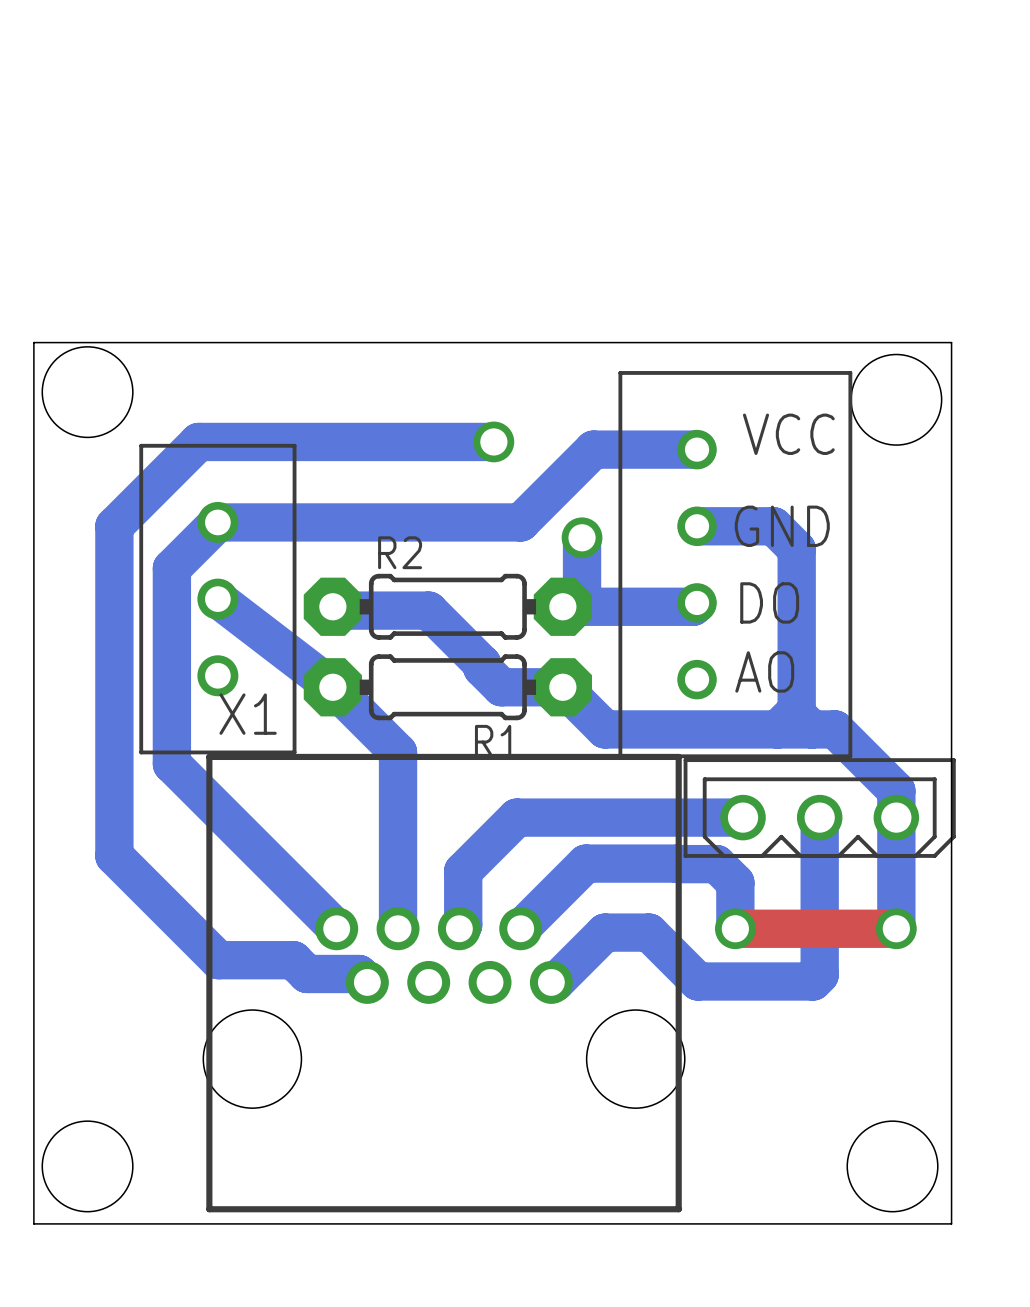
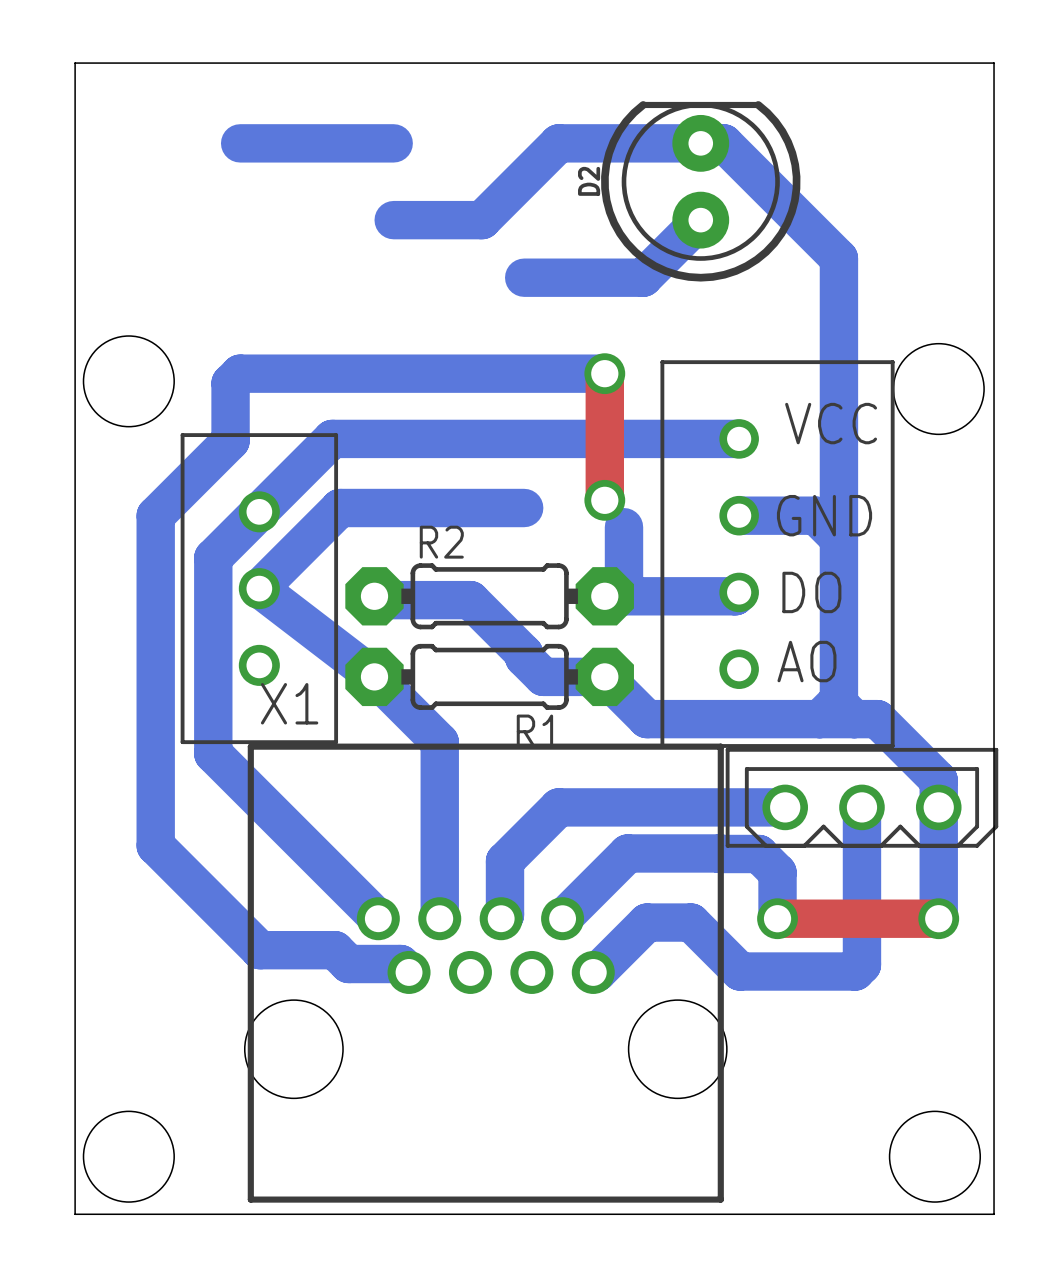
bottom track: none -> (240, 143) (393, 143)
D2: none -> (700, 191)
bottom track: none -> (393, 220) (481, 220) (558, 143) (723, 143) (838, 258) (838, 538)
bottom track: none -> (700, 220) (643, 277) (524, 277)
board edge: (33, 342) (951, 342) -> (75, 331) (75, 63) (994, 63) (994, 331)
top track: none -> (604, 373) (604, 500)
via: none -> (604, 373)
bottom track: (493, 441) (198, 441) (189, 451) -> (604, 373) (240, 373) (230, 383) (230, 440)
via: (493, 441) -> none
bottom track: (593, 449) (520, 522) (217, 522) -> (635, 438) (332, 438) (259, 511)
bottom track: none -> (524, 508) (339, 508) (259, 588)
via position: (582, 537) -> (604, 500)

